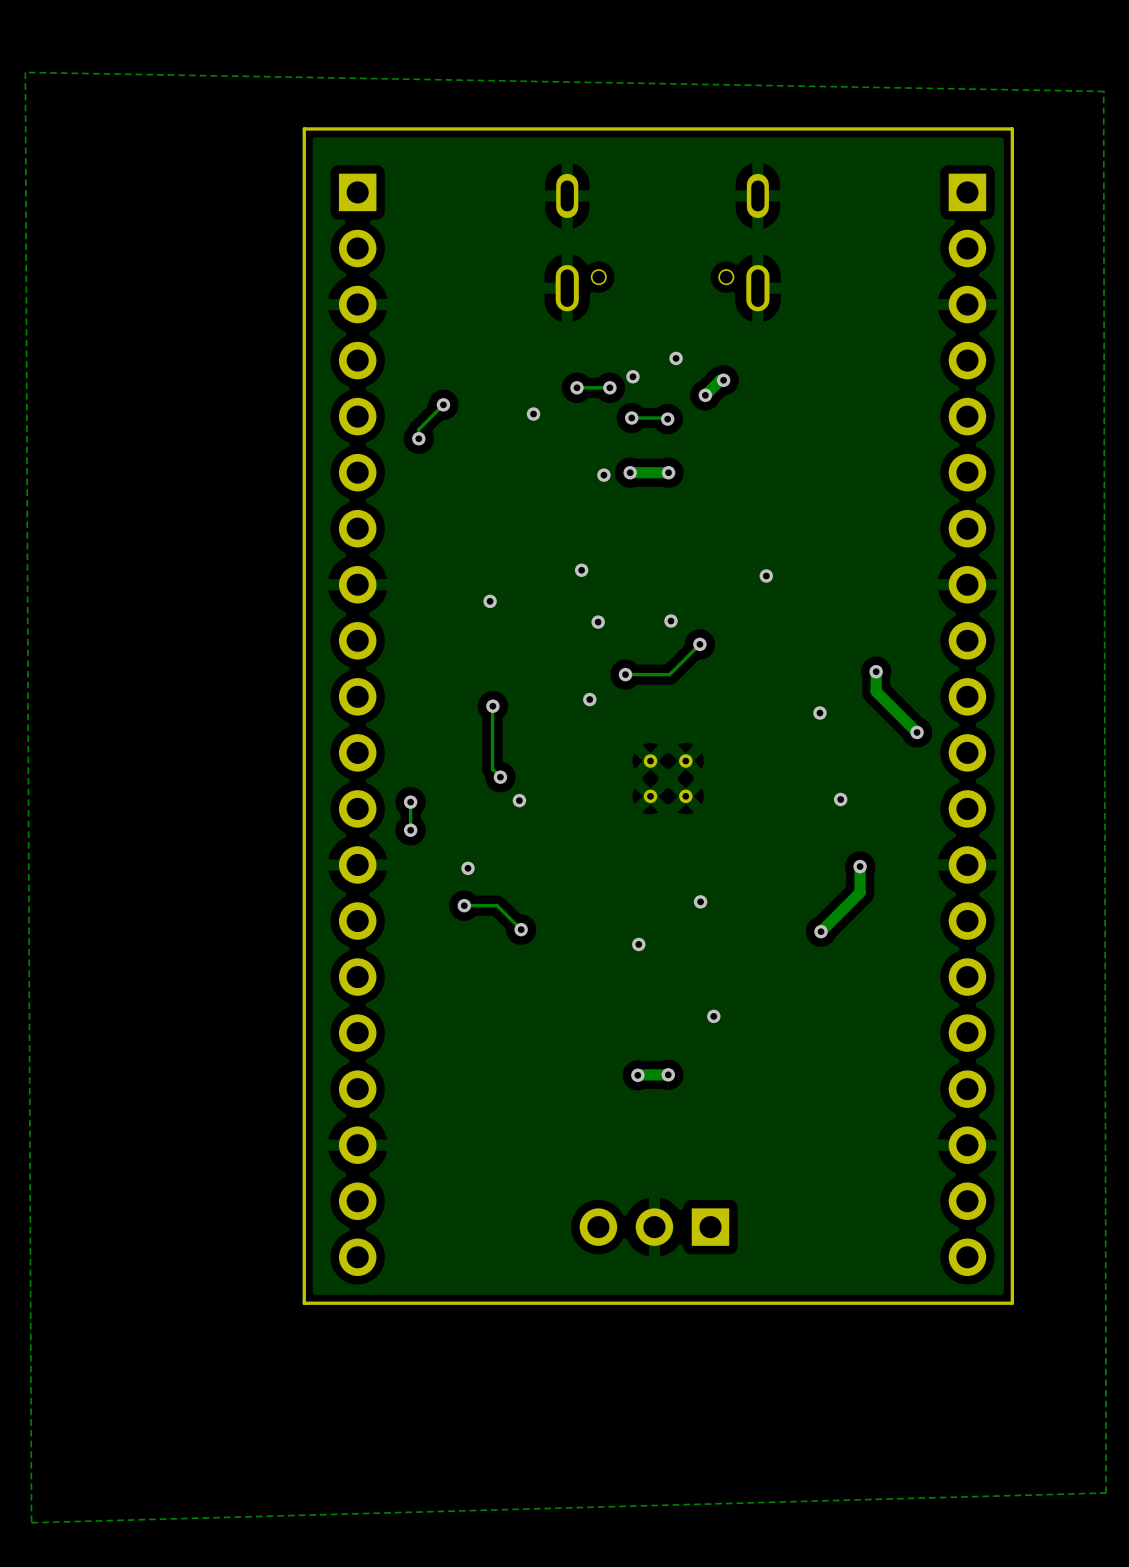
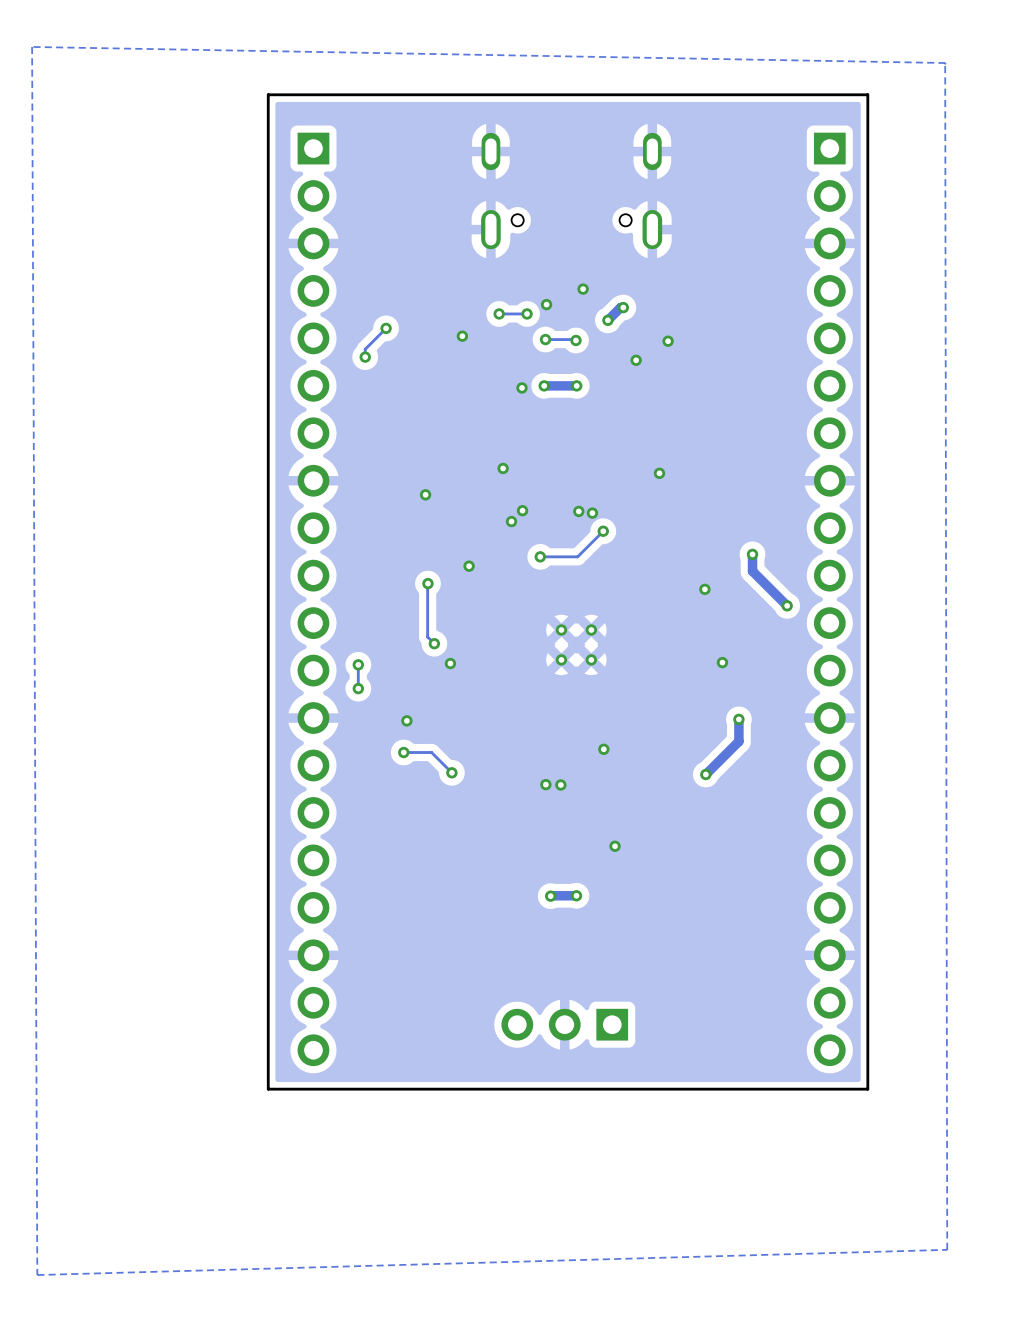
via: none -> (668, 341)
via: none -> (636, 360)
via: none -> (522, 510)
via: (598, 622) -> none
via: none -> (592, 513)
via: none -> (511, 521)
via: none -> (469, 566)
via: (589, 699) -> none
via: none -> (545, 784)
via: (638, 944) -> none
via: none -> (560, 784)

